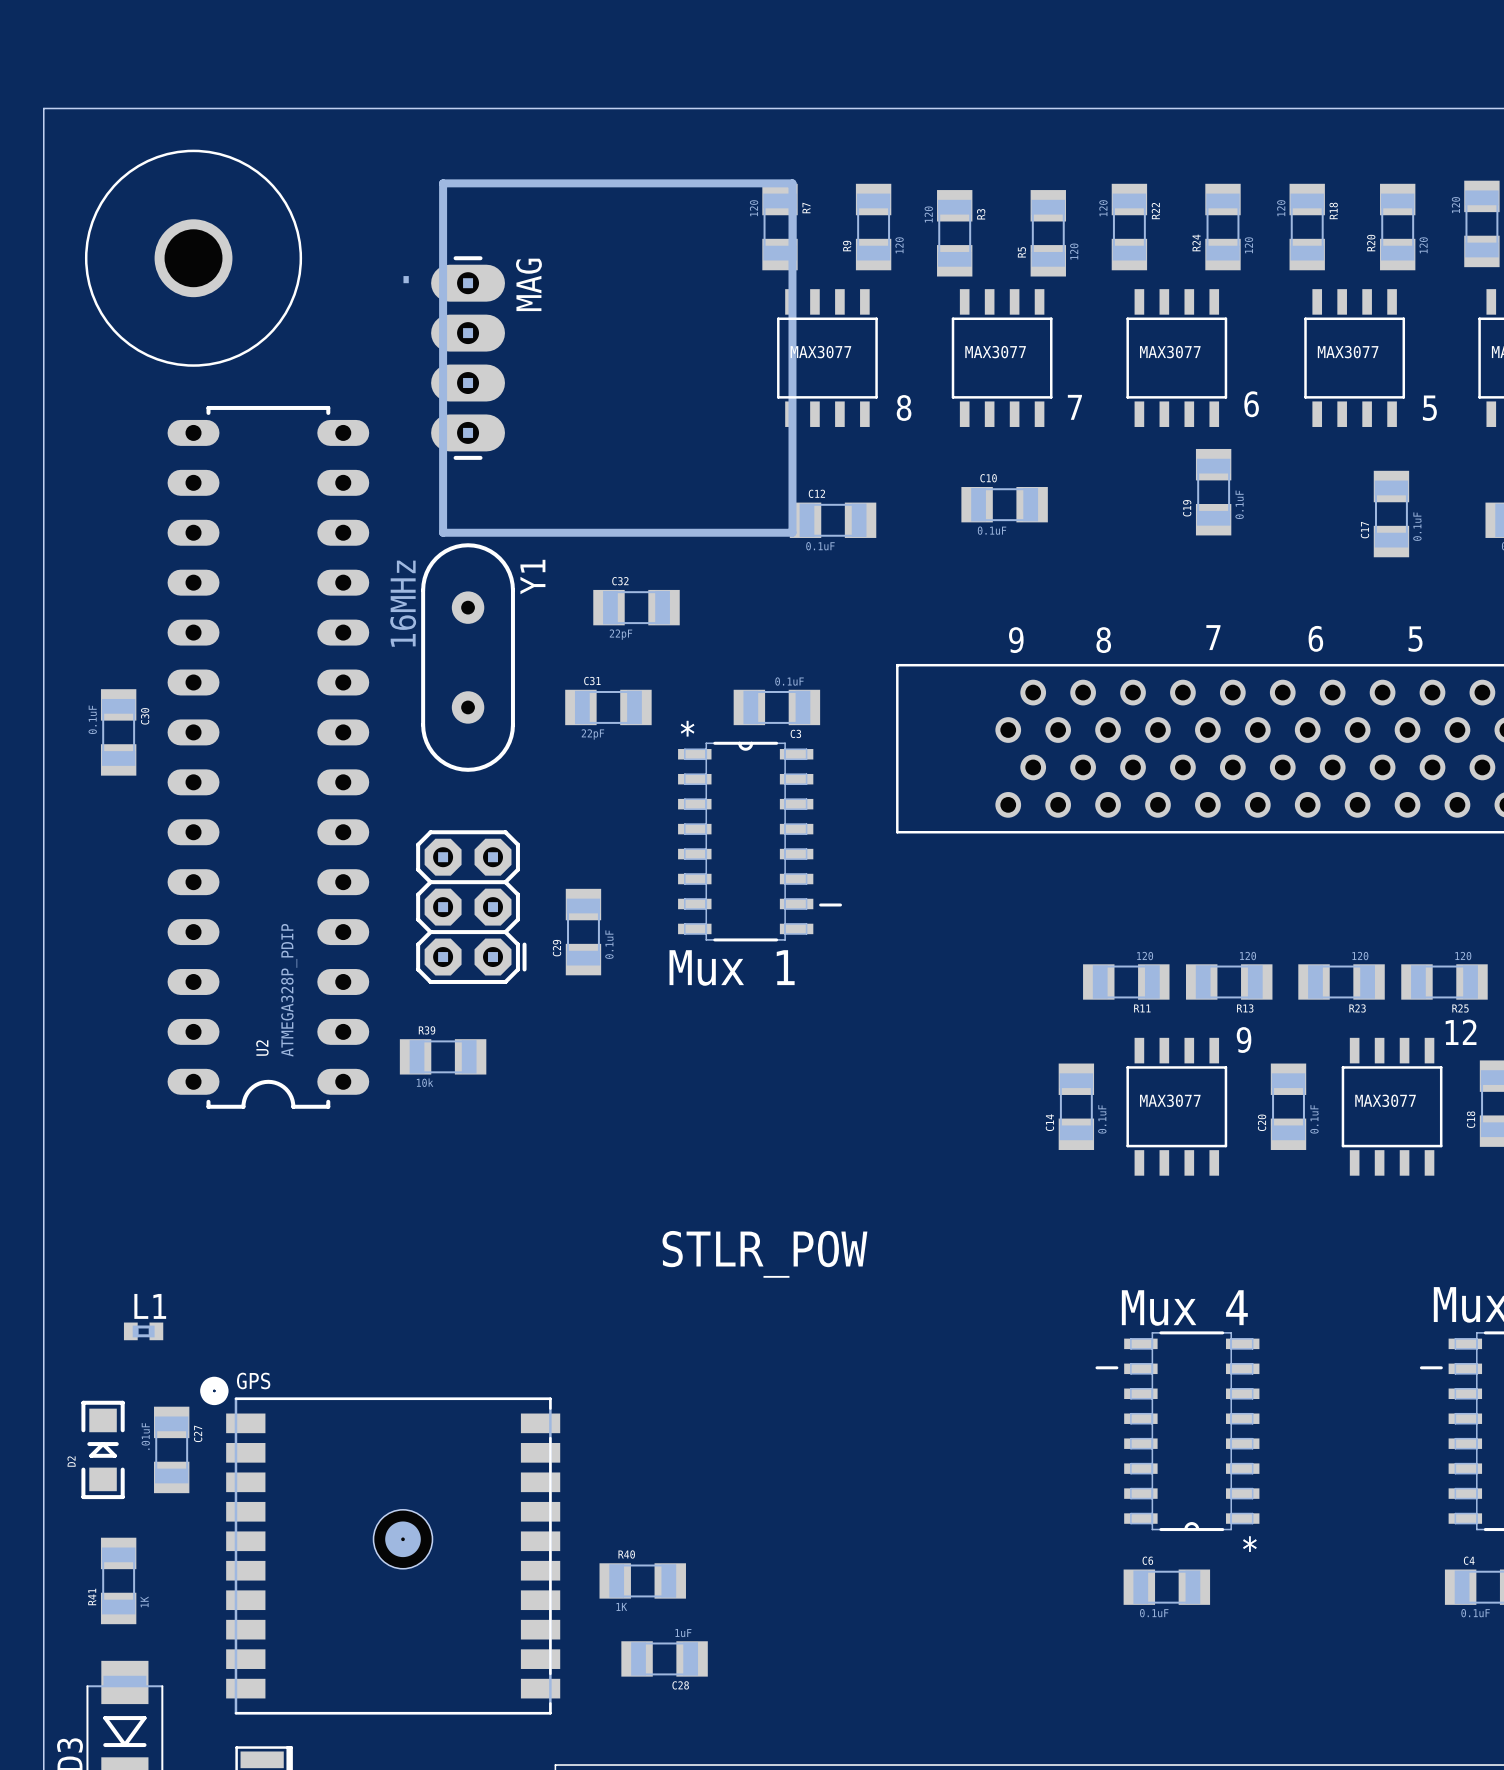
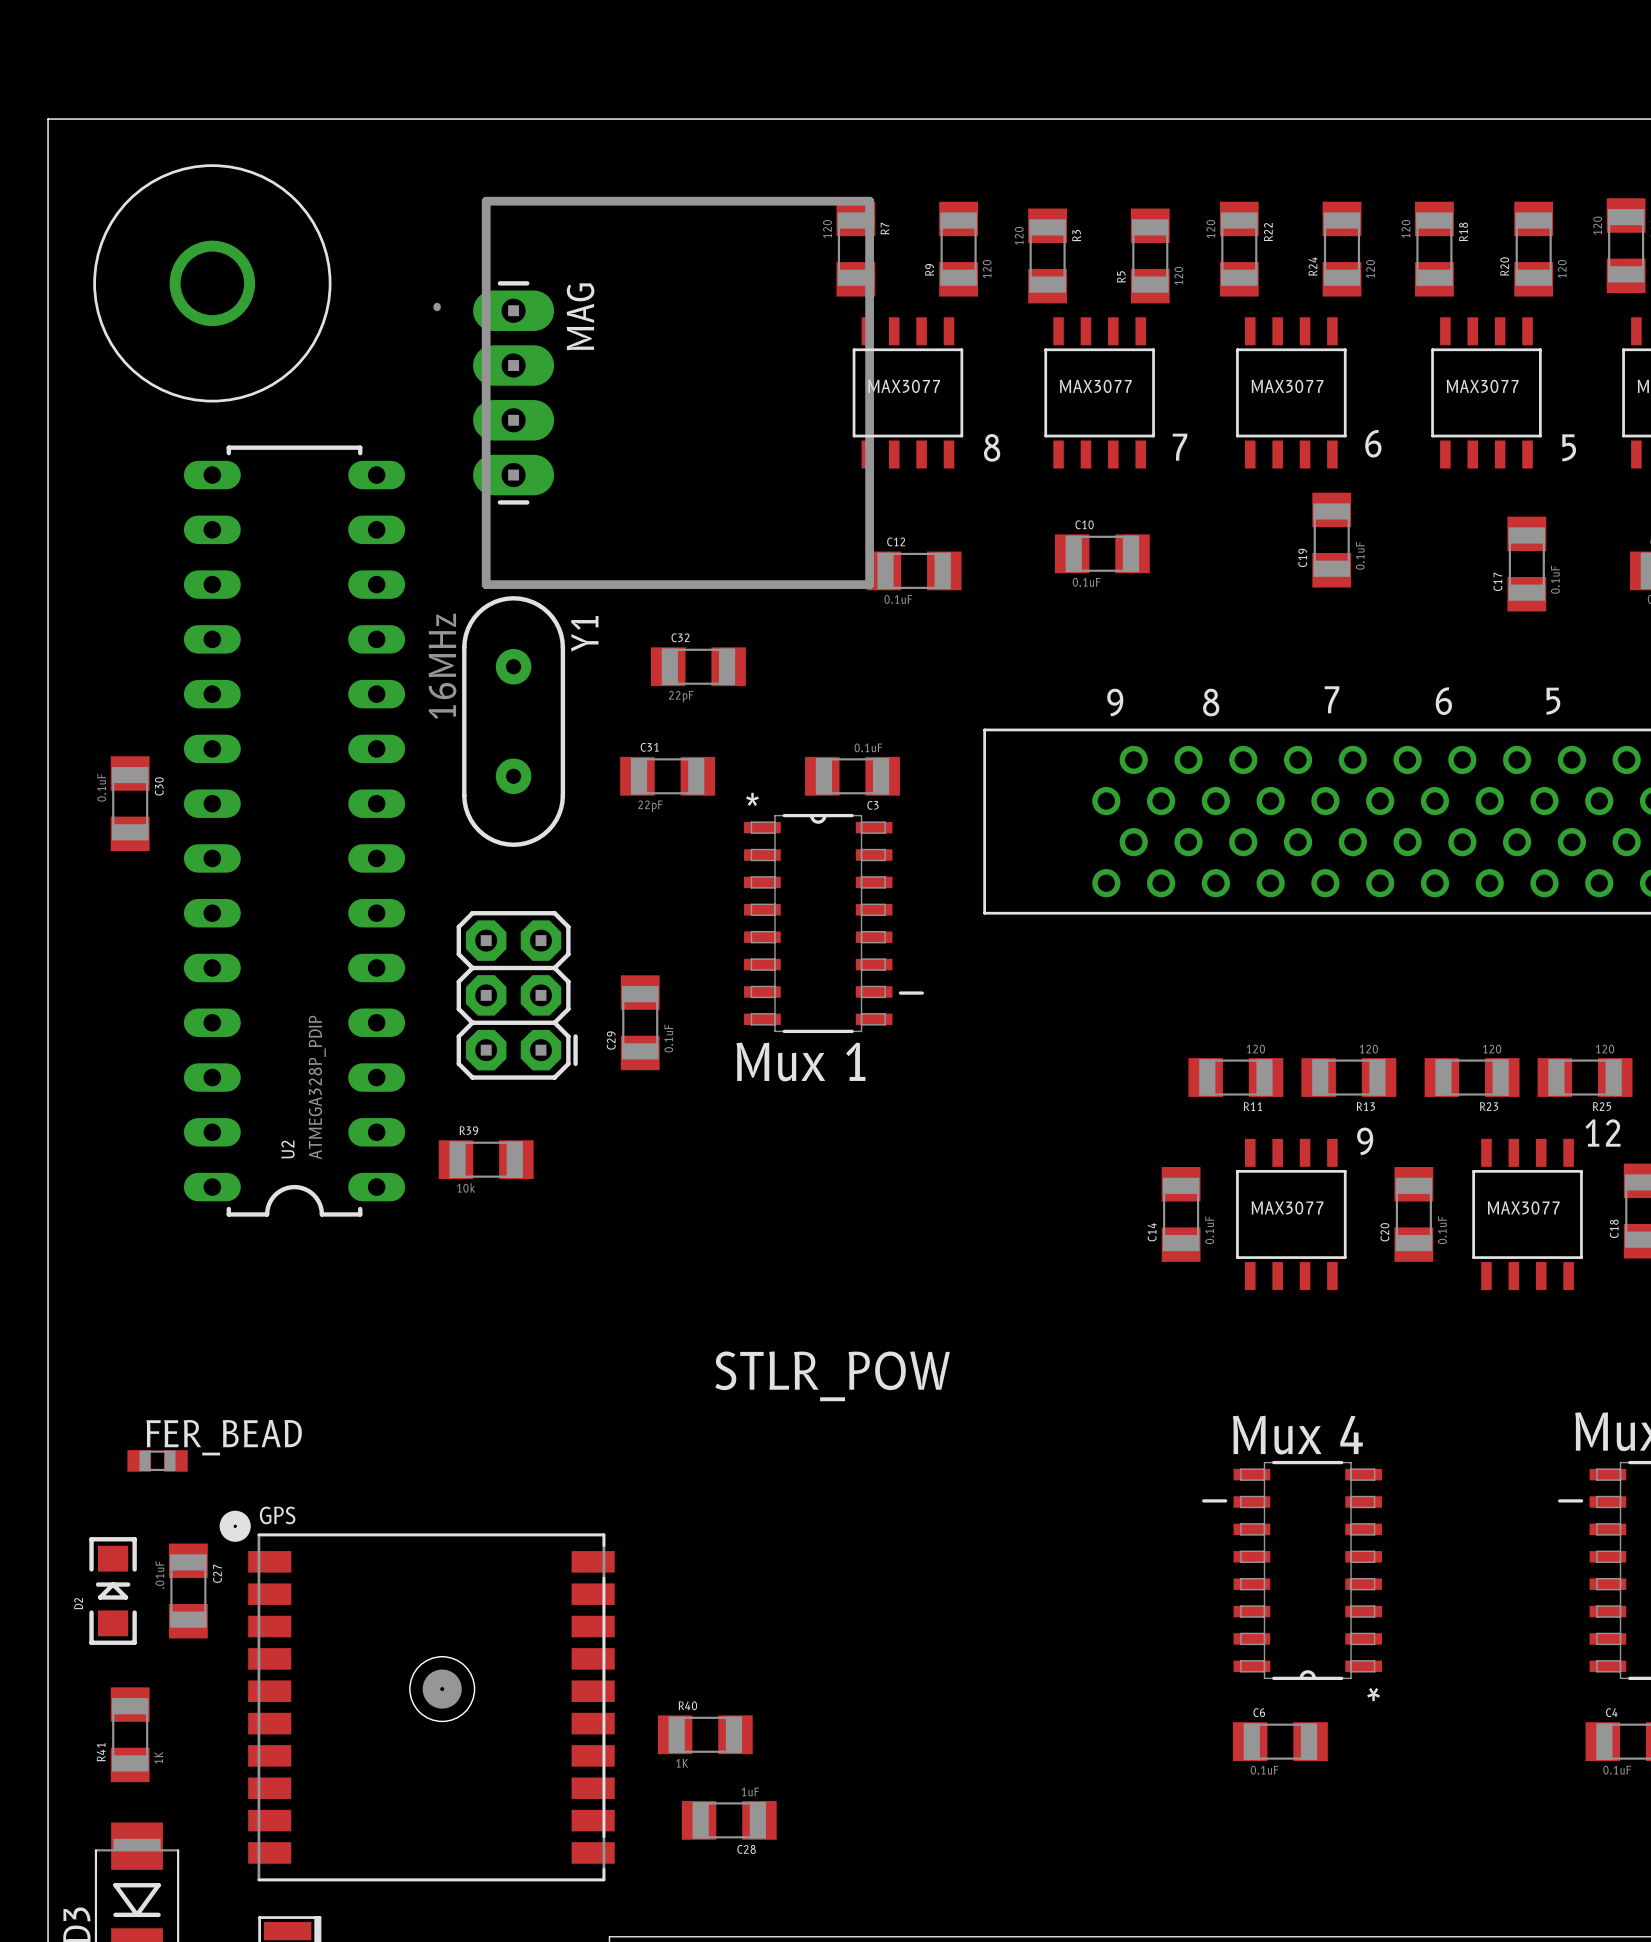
L1: (143, 1331) -> none
FER_BEAD: none -> (157, 1460)

